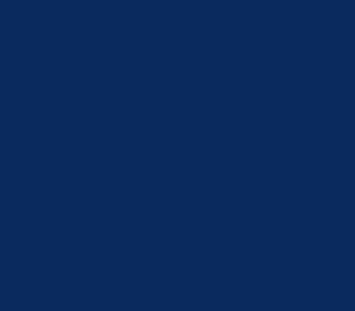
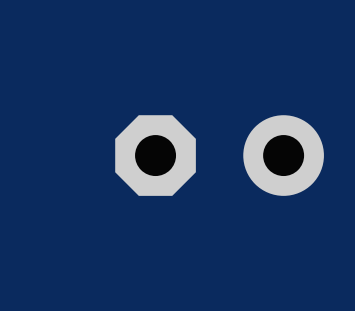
part: none -> (219, 155)

